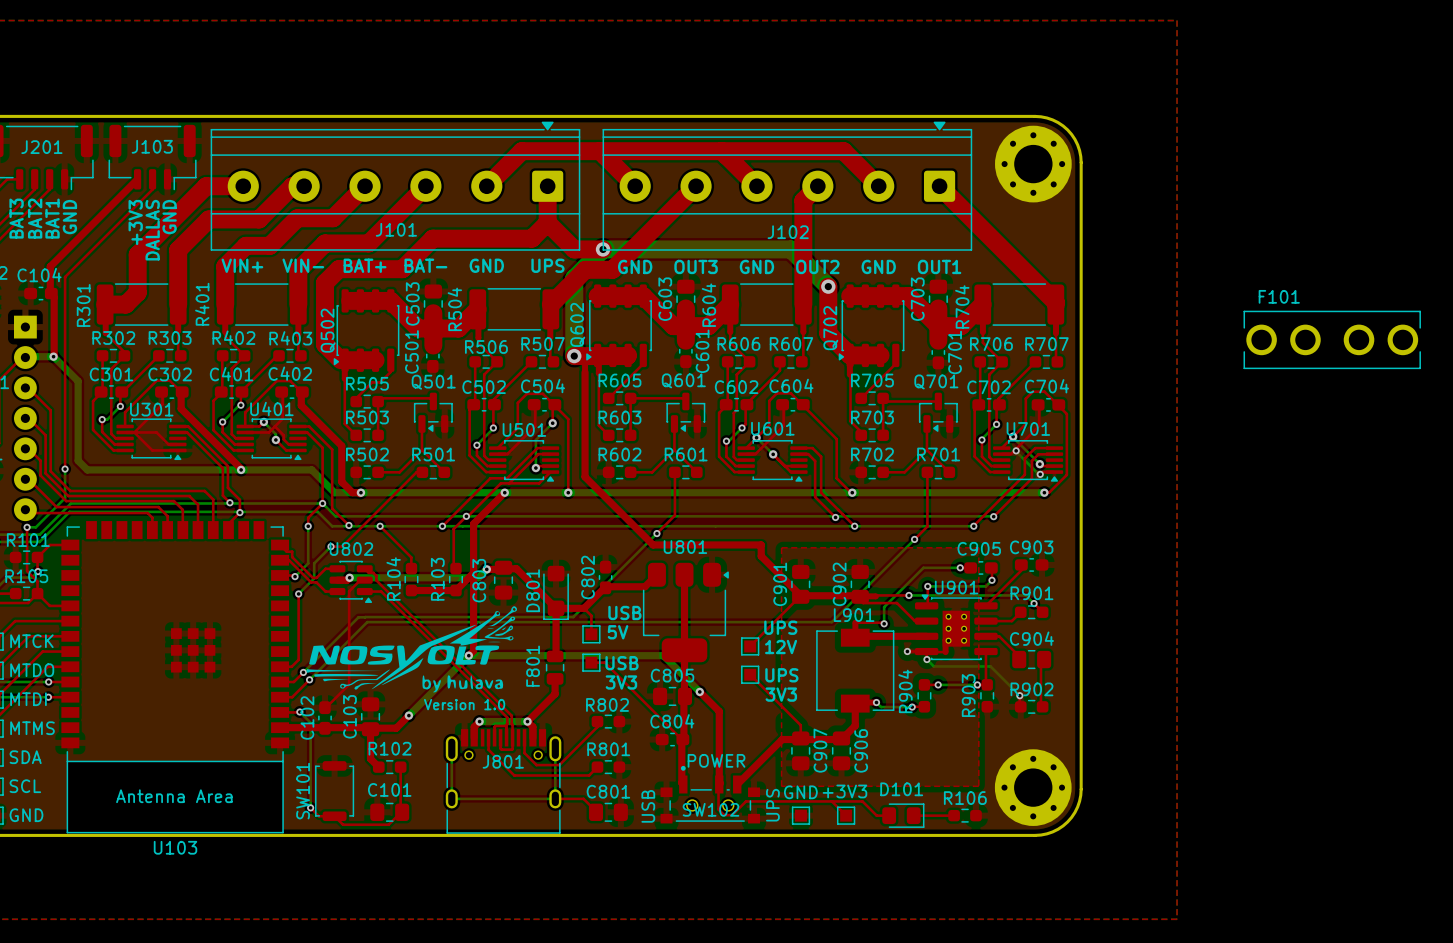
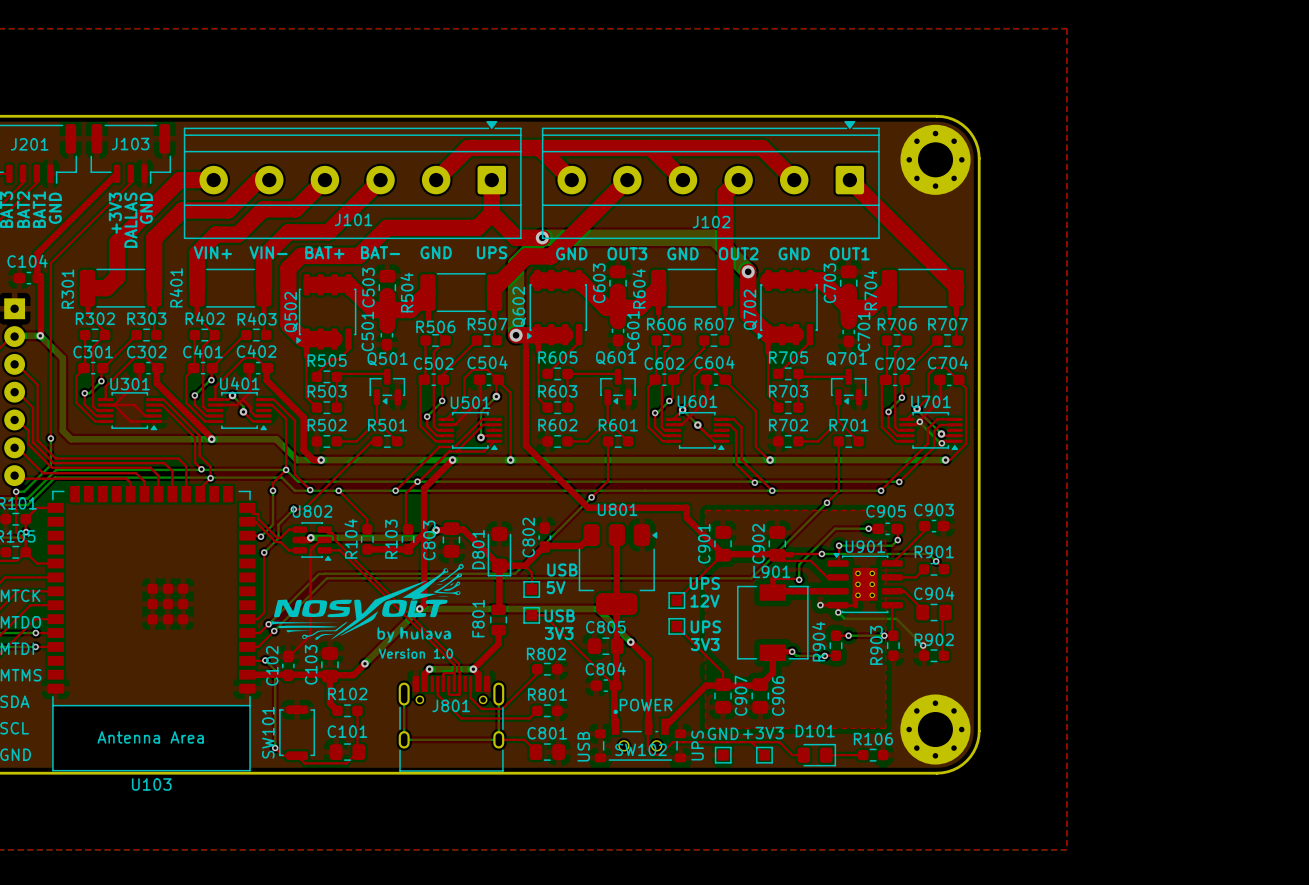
F101: (1332, 339) -> none

